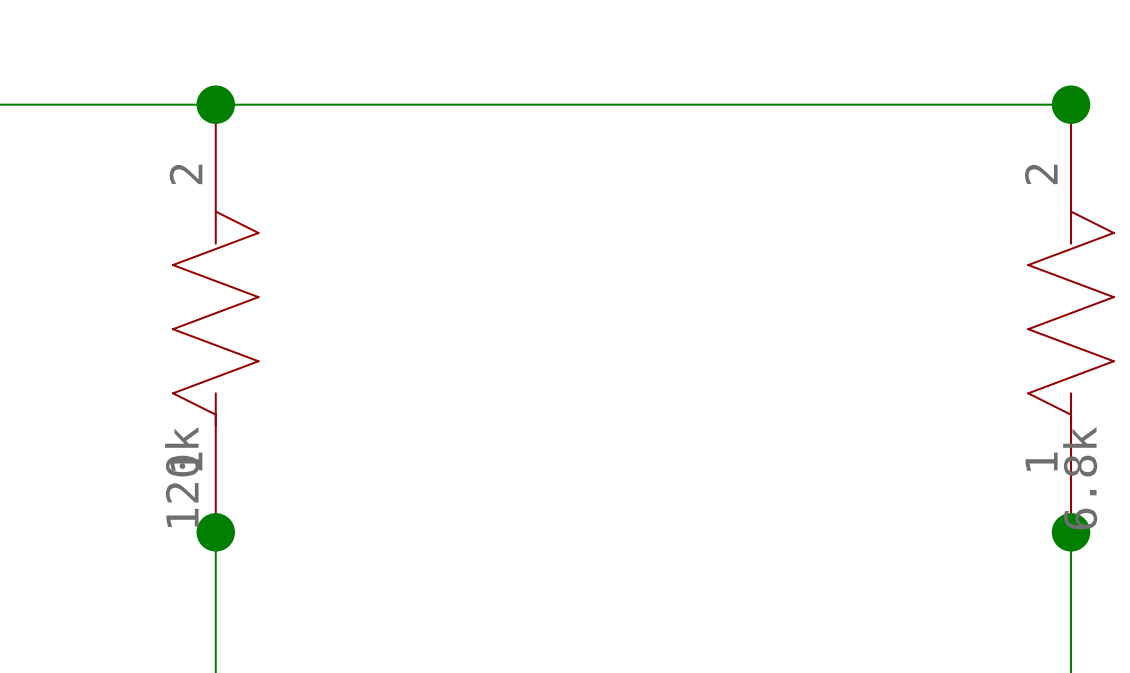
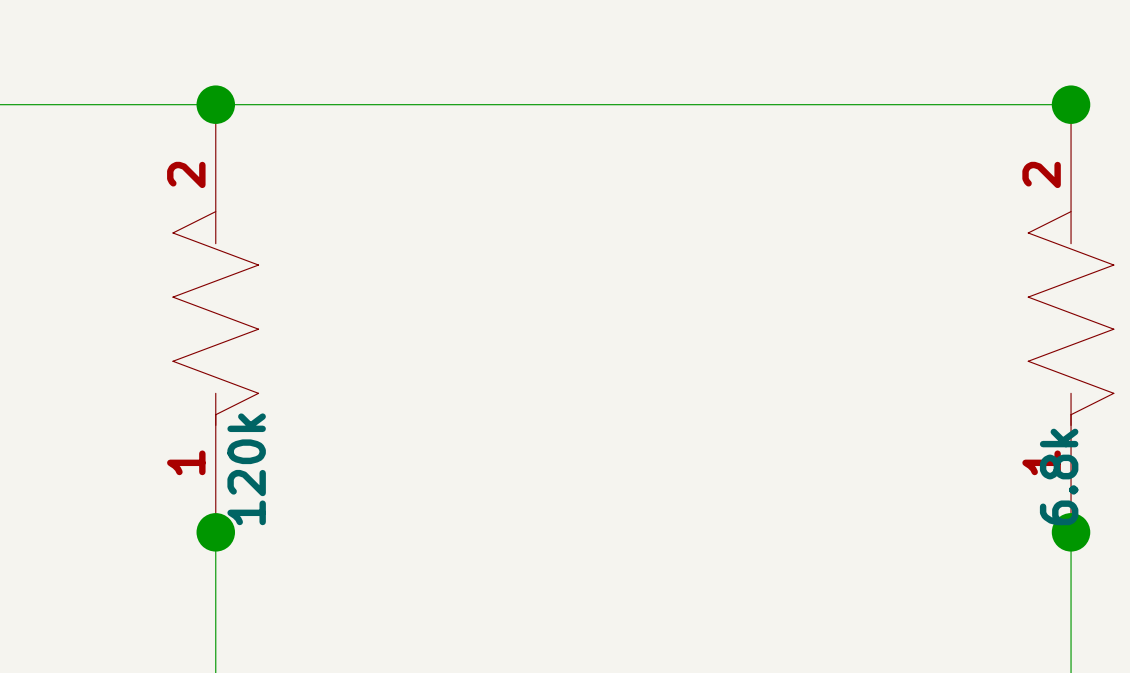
part flip: as is (215, 318) -> left-right (215, 318)
part flip: as is (1071, 318) -> left-right (1071, 318)

